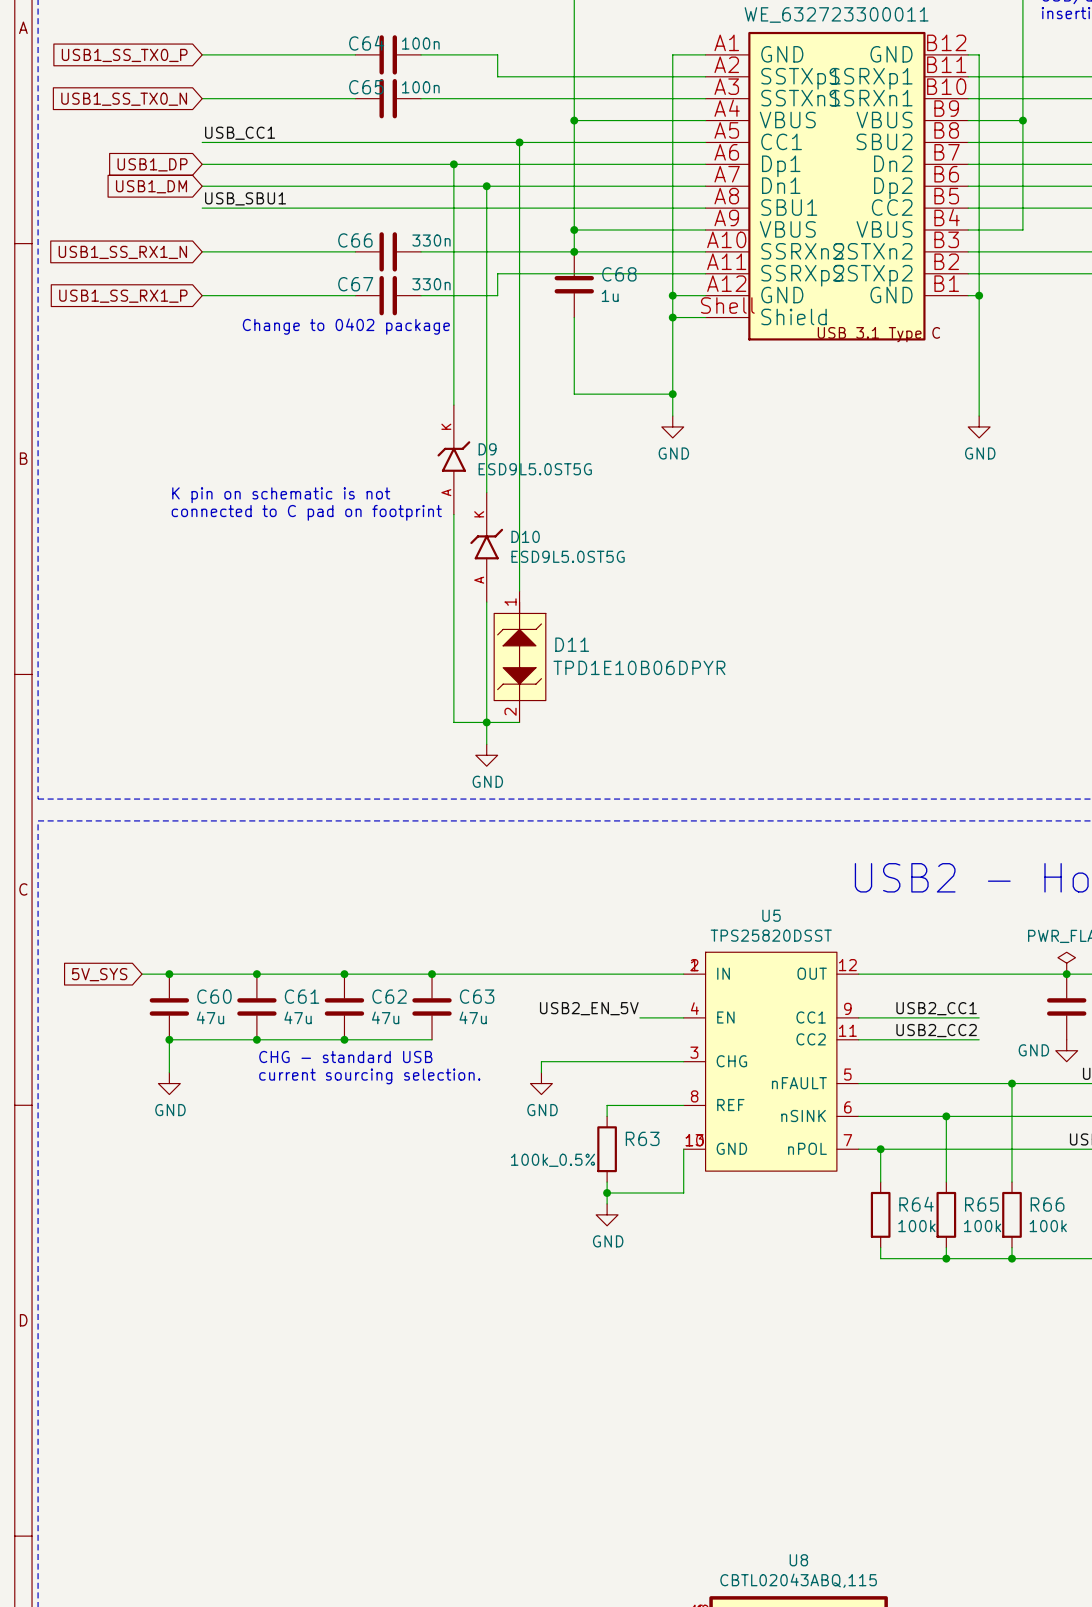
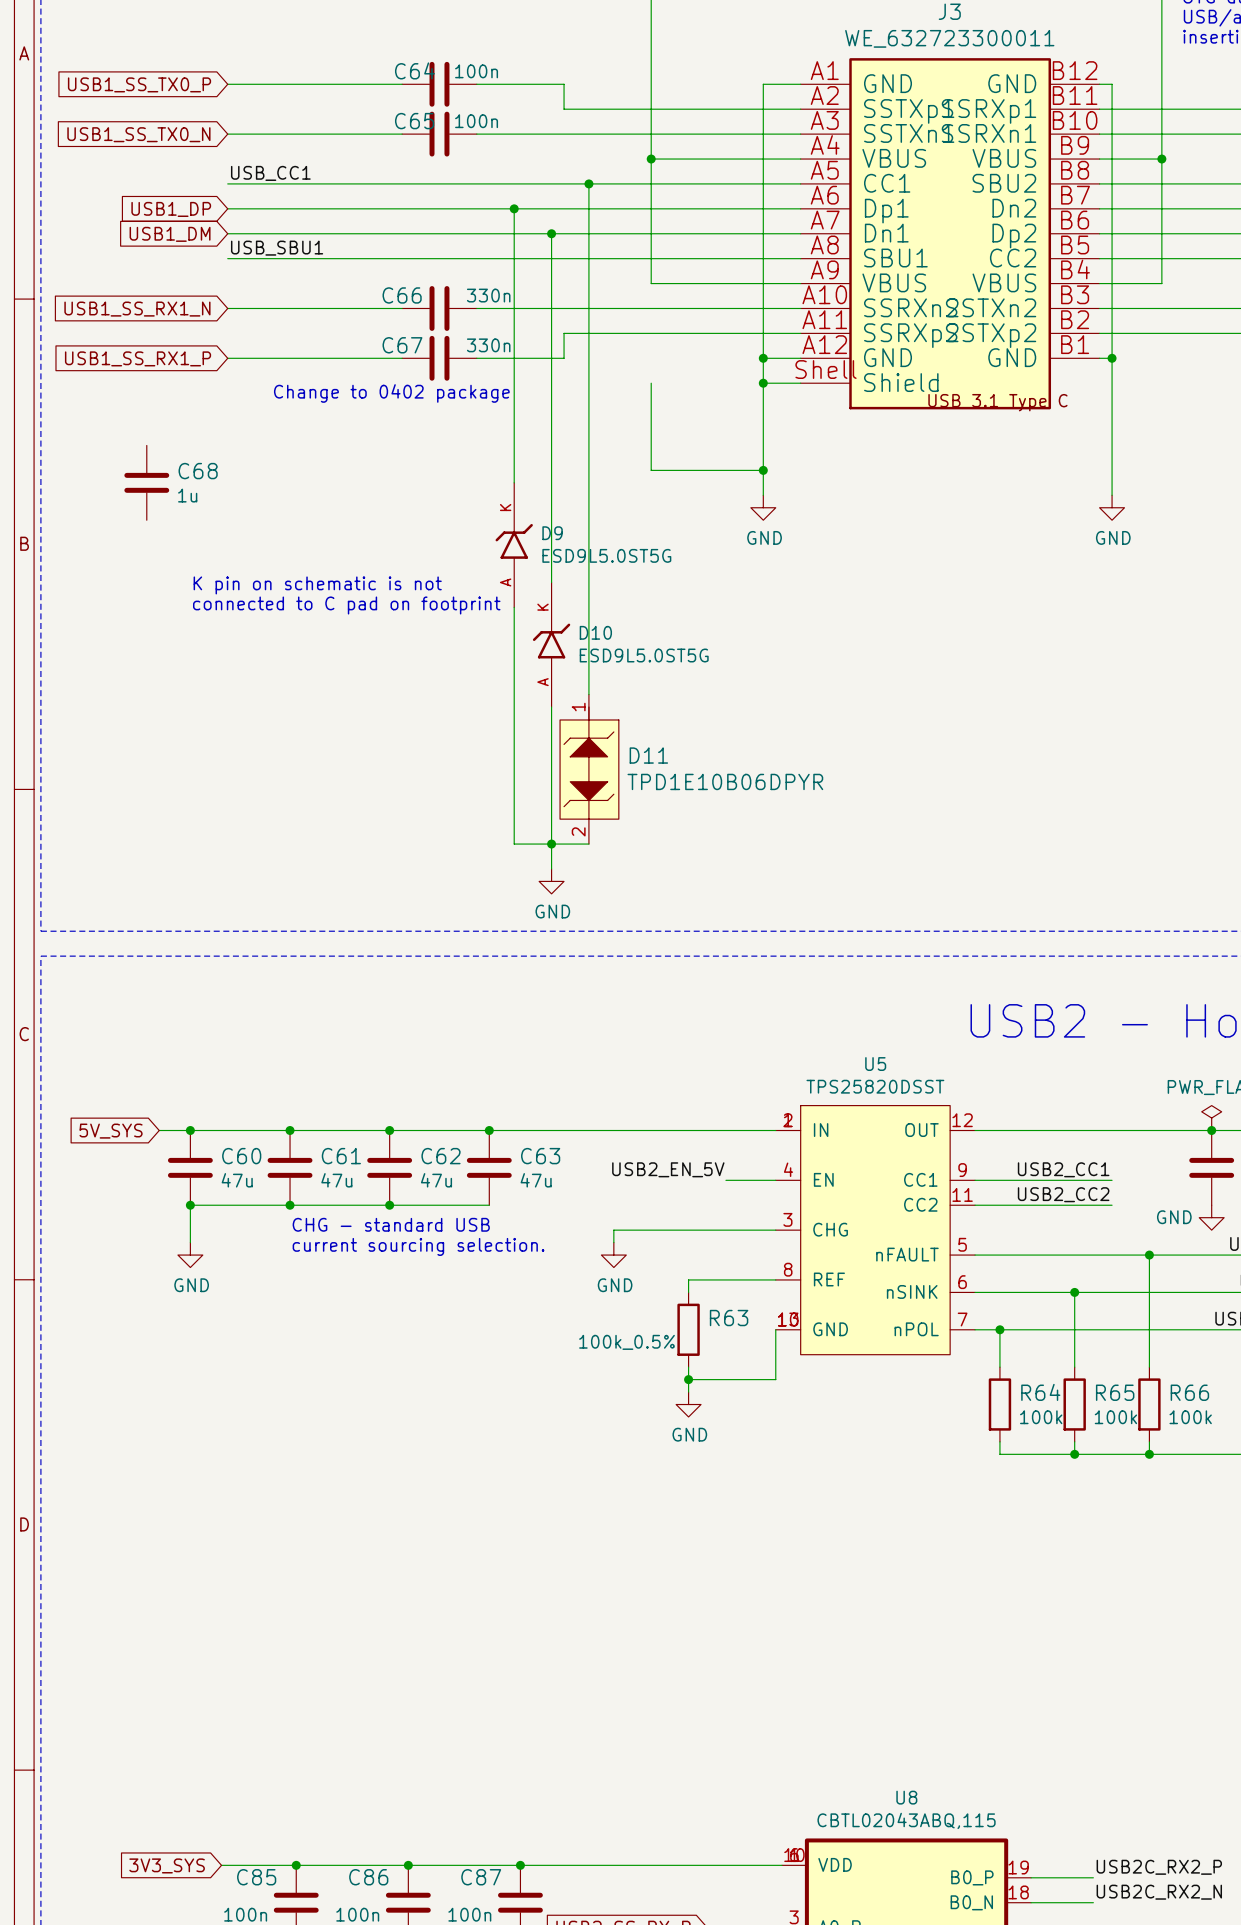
wire: (574, 230) (574, 251) -> none
junction: (574, 230) -> none
junction: (574, 251) -> none
C68 position: (574, 284) -> (146, 482)

